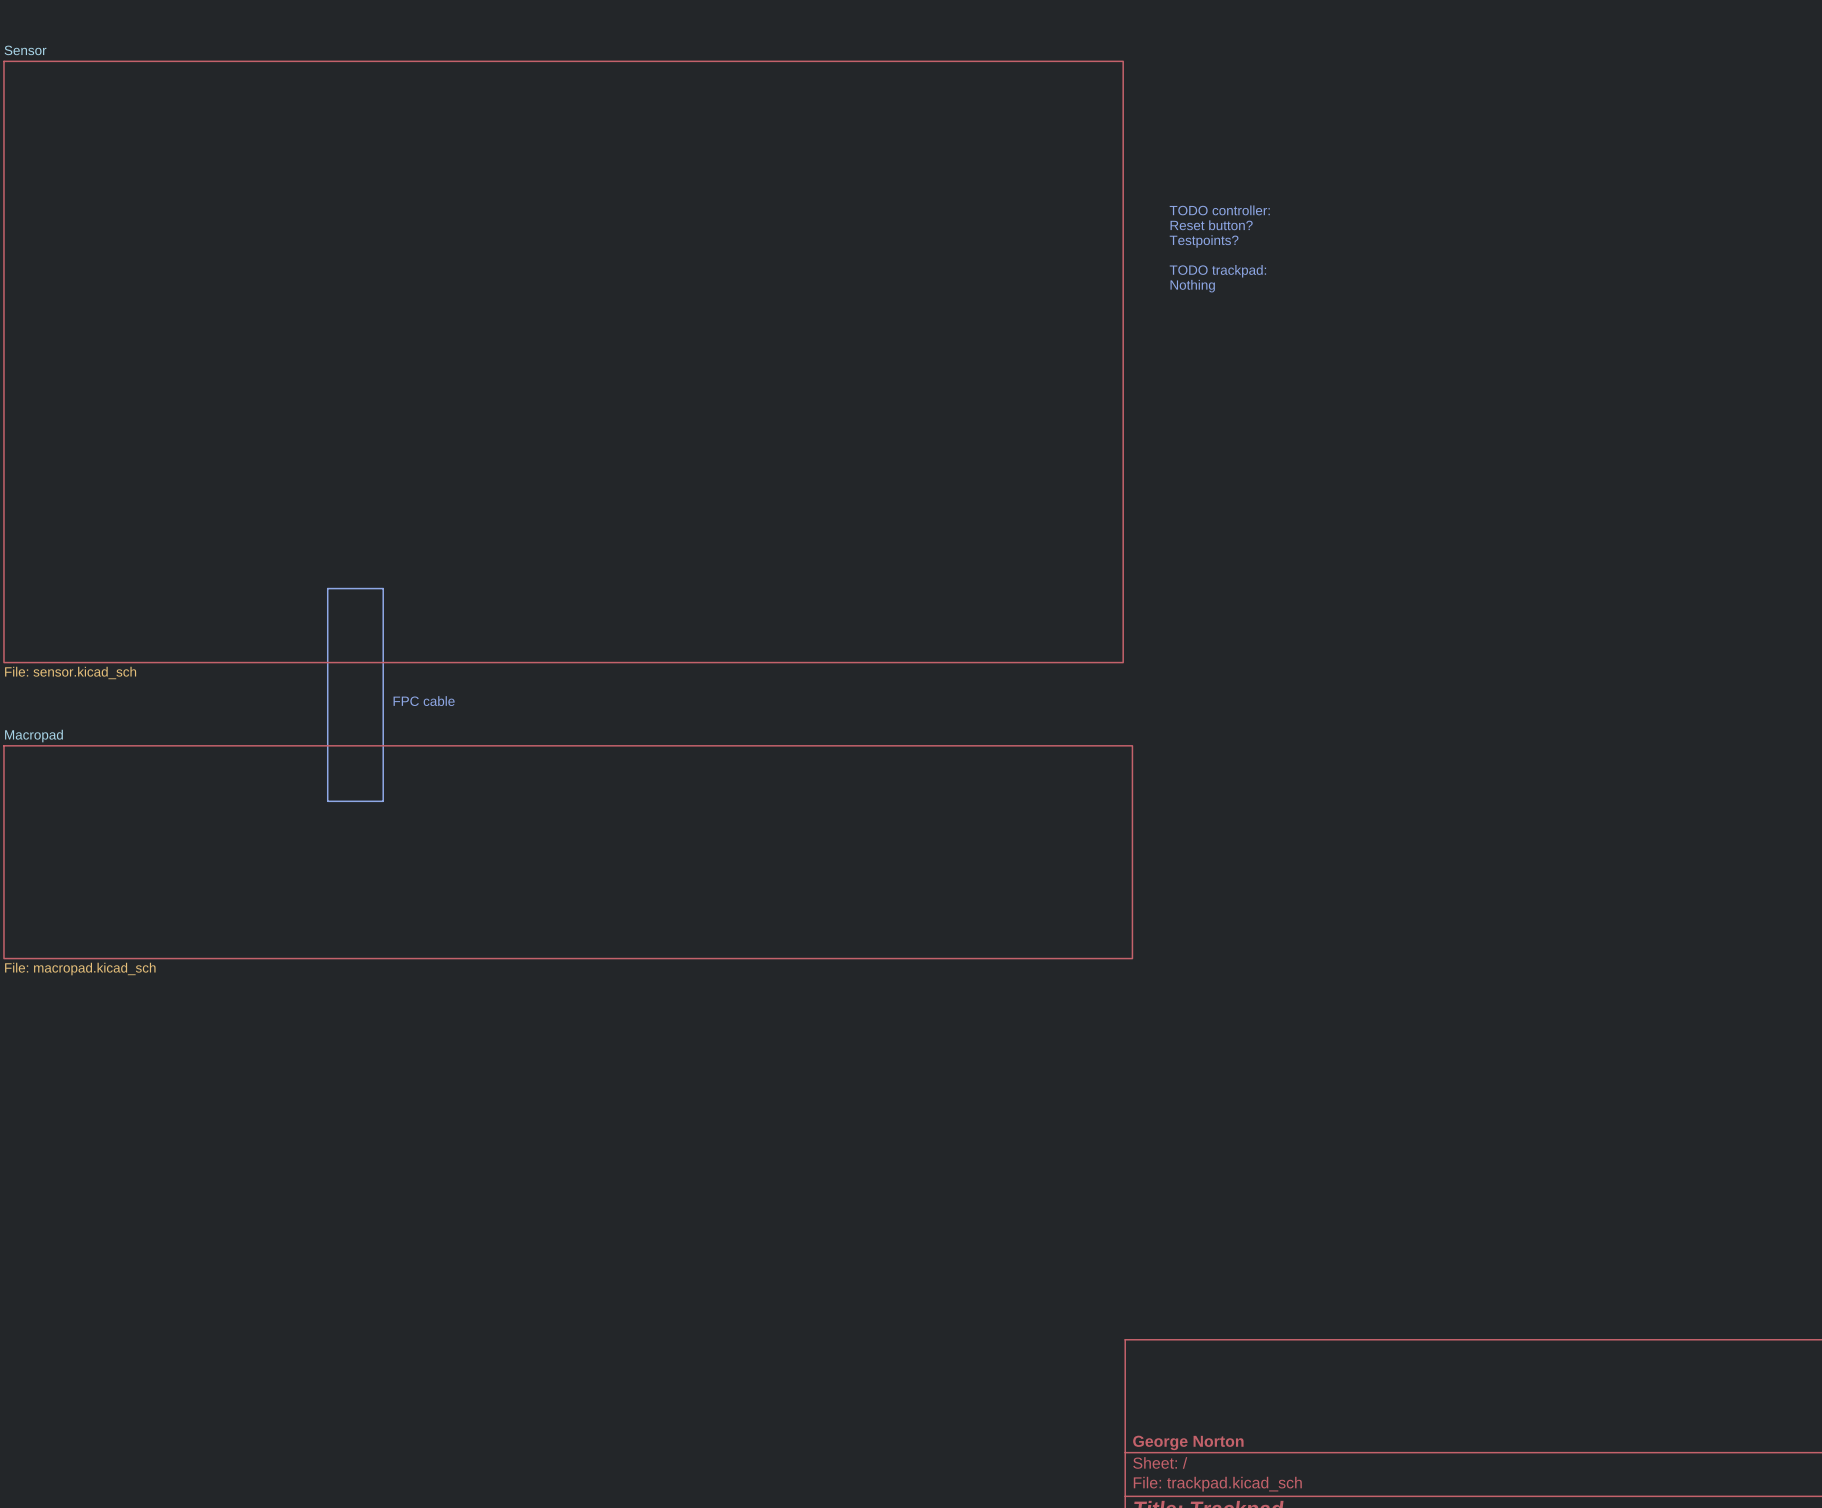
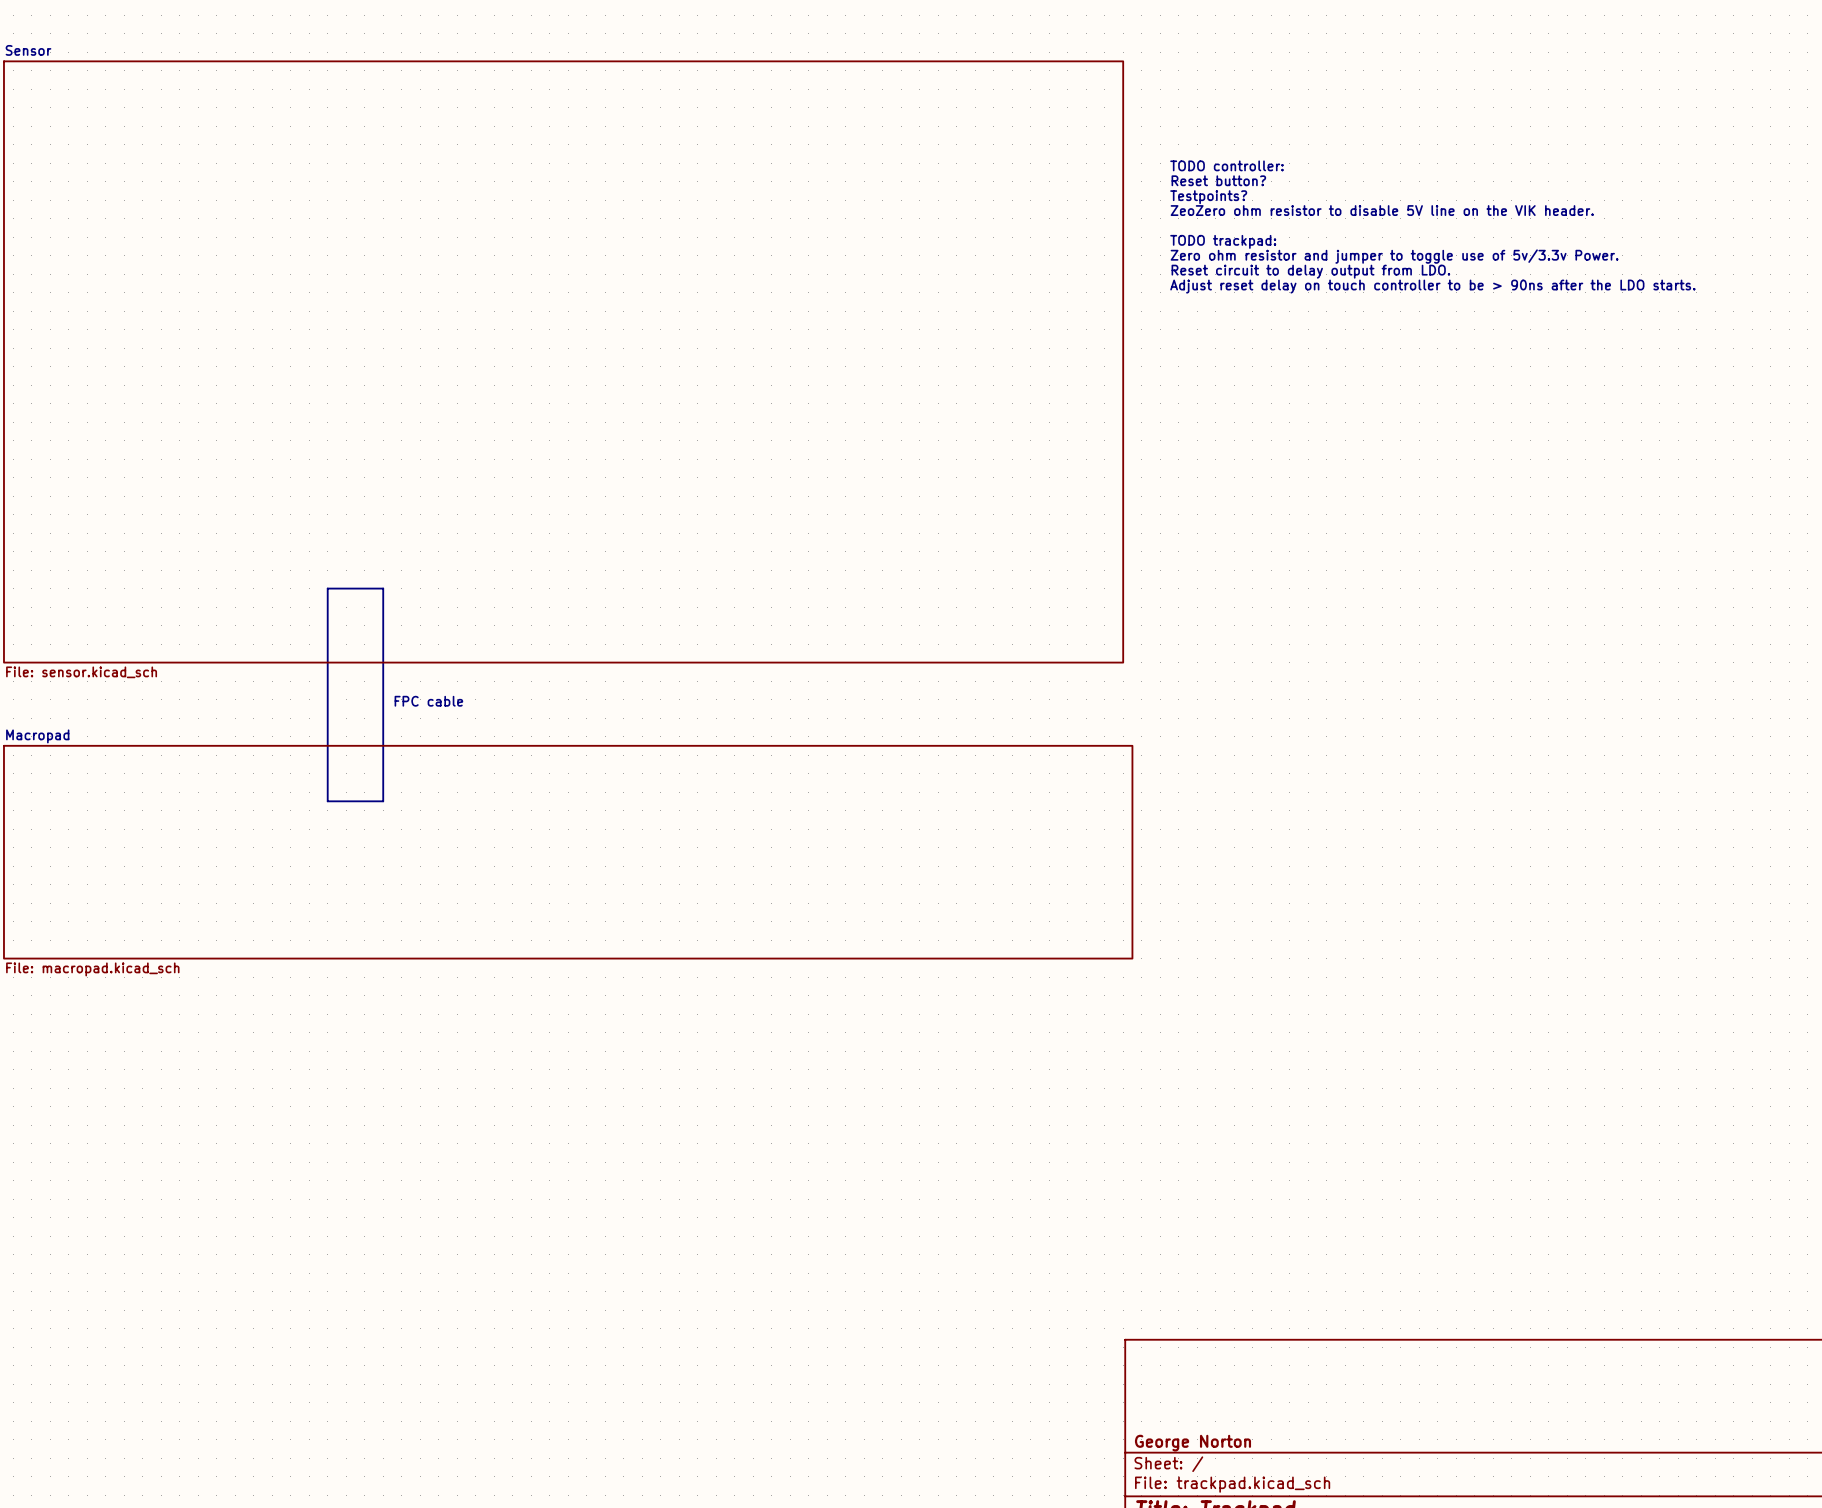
text: none -> TODO controller: (1226, 165)
text: none -> Testpoints? (1208, 197)
text: TODO controller: (1219, 210) -> ZeoZero ohm resistor to disable 5V line on the VIK header. (1382, 210)
text position: Reset button? (1211, 225) -> Reset button? (1218, 180)
text: Testpoints? (1204, 241) -> TODO trackpad: (1223, 241)
text: none -> Zero ohm resistor and jumper to toggle use of 5v/3.3v Power. (1394, 256)
text: TODO trackpad: (1217, 271) -> Reset circuit to delay output from LDO. (1310, 271)
text: Nothing (1192, 286) -> Adjust reset delay on touch controller to be > 90ns after the LDO starts. (1432, 286)

